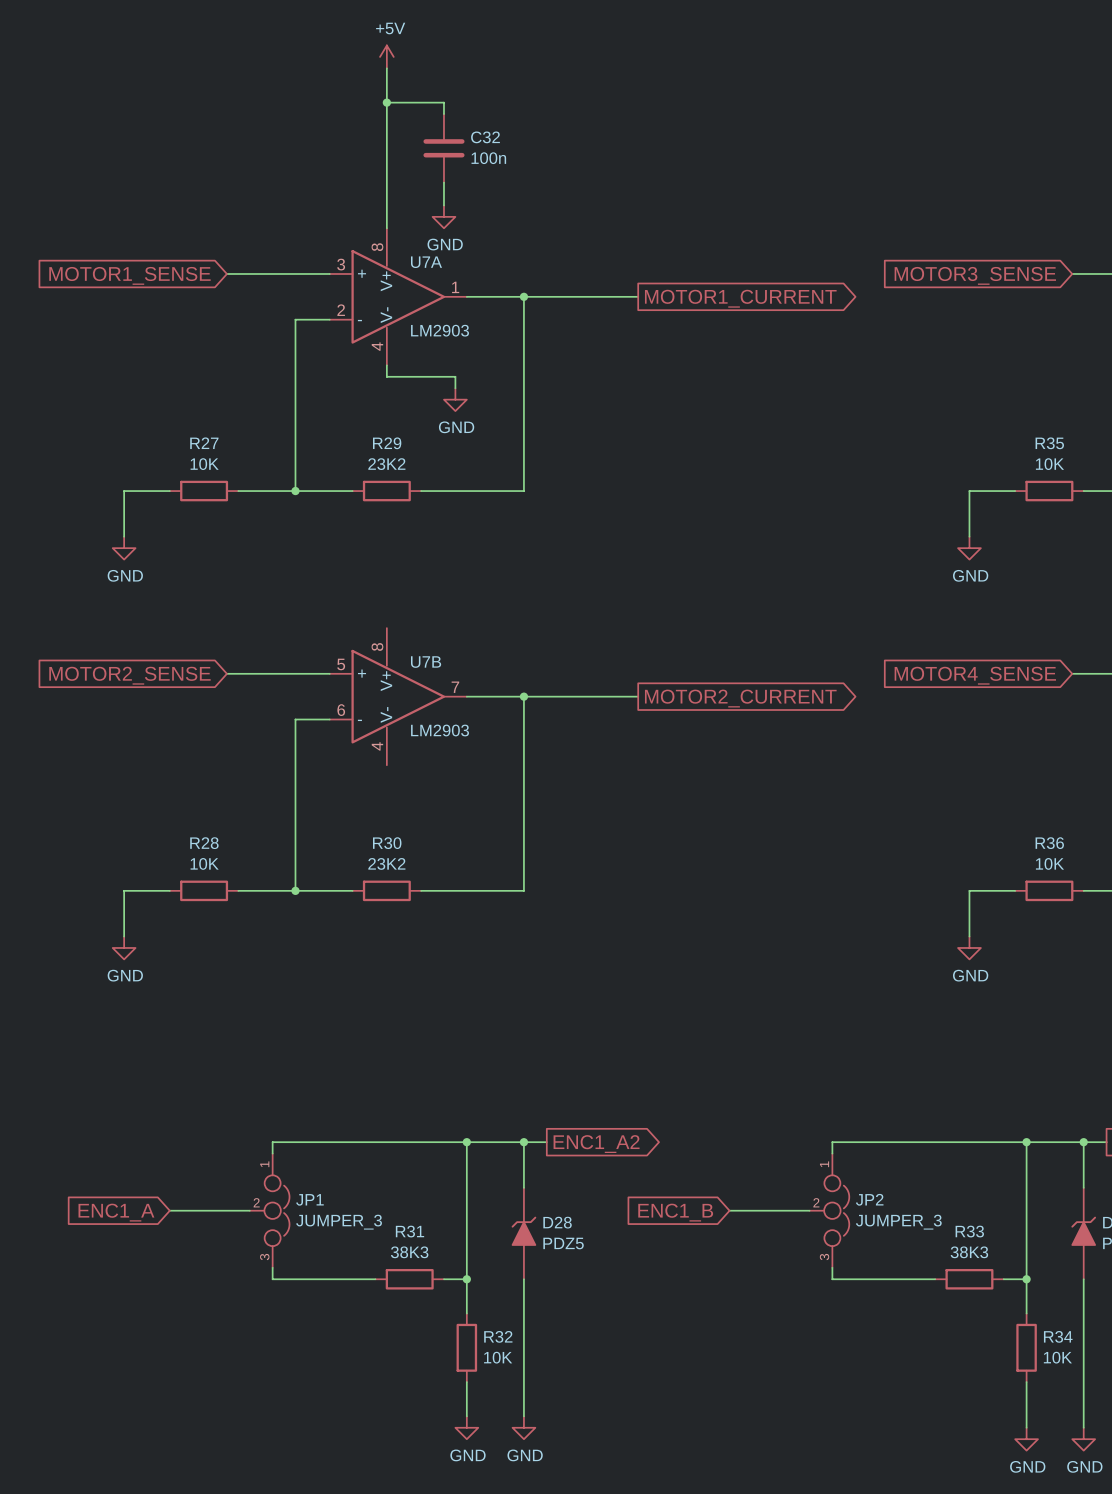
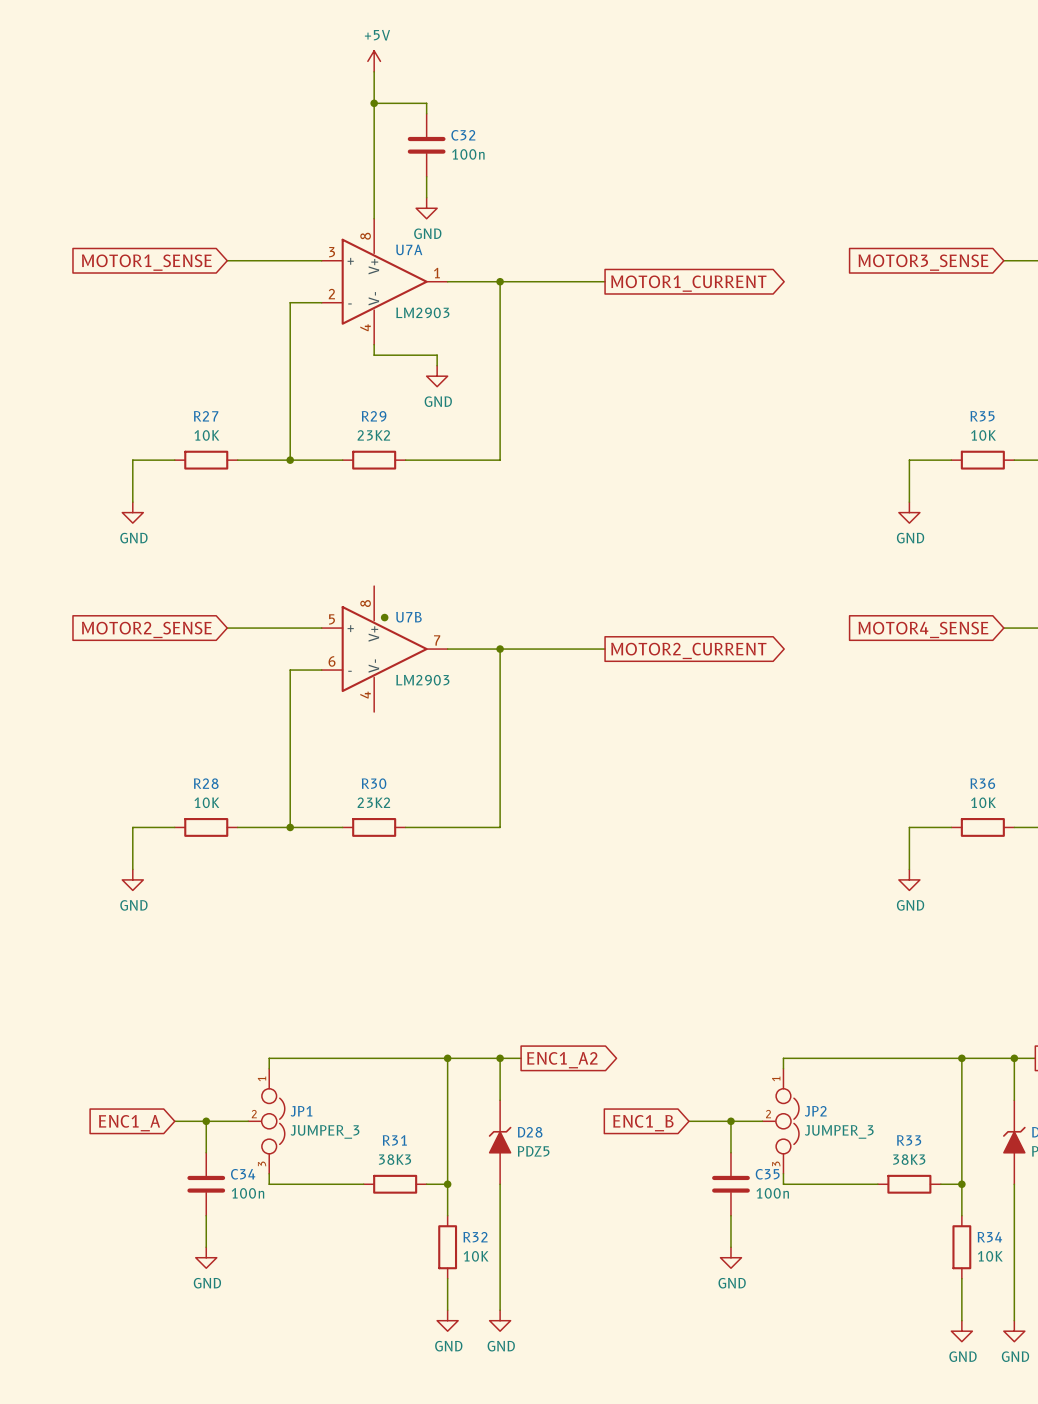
junction: none -> (384, 617)
wire: none -> (206, 1121) (206, 1152)
junction: none -> (206, 1121)
wire: none -> (730, 1121) (730, 1152)
junction: none -> (730, 1121)
C34: none -> 100n (206, 1184)
C35: none -> 100n (730, 1184)
wire: none -> (206, 1215) (206, 1247)
wire: none -> (730, 1215) (730, 1247)
power symbol: none -> GND (206, 1257)
power symbol: none -> GND (730, 1257)

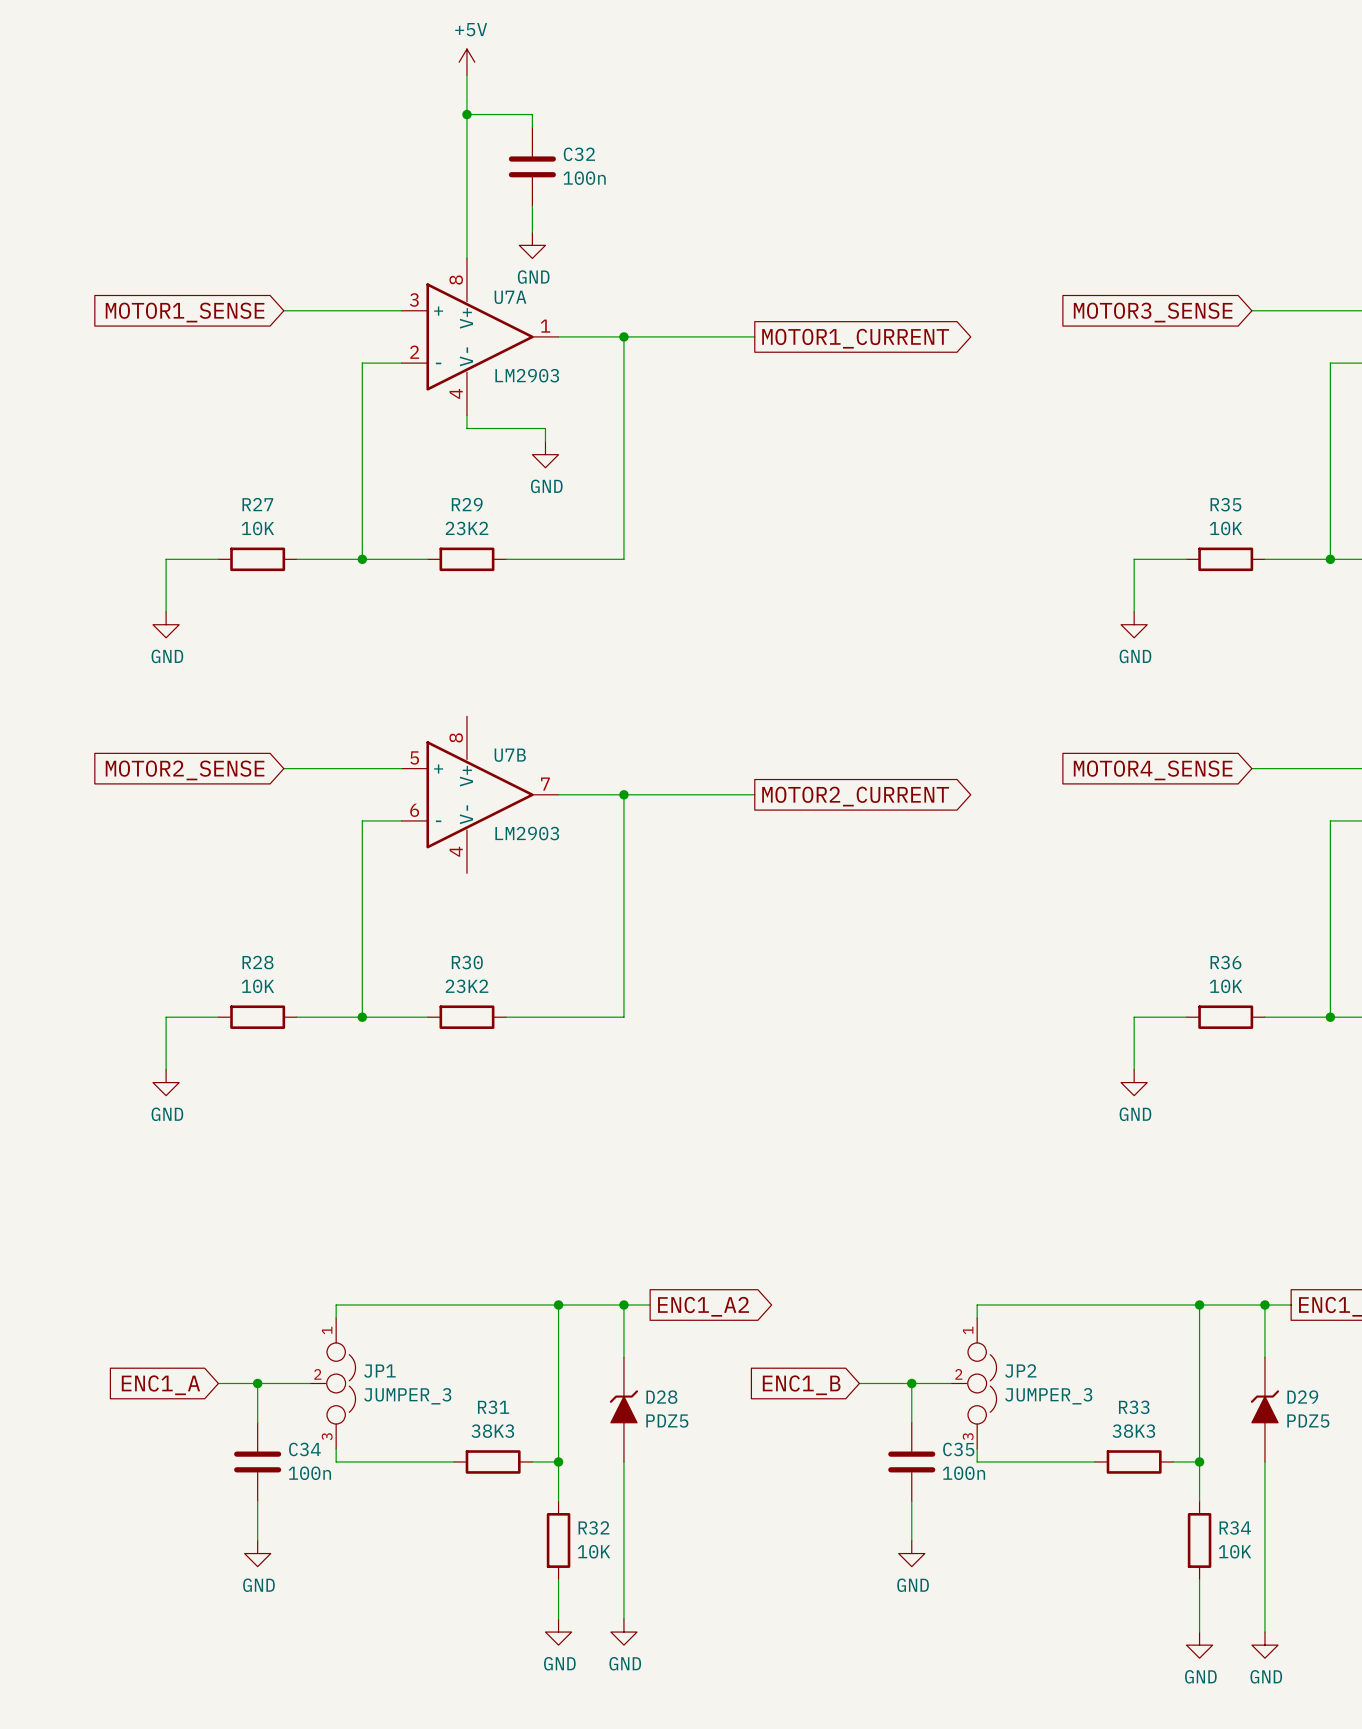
junction: (384, 617) -> none

